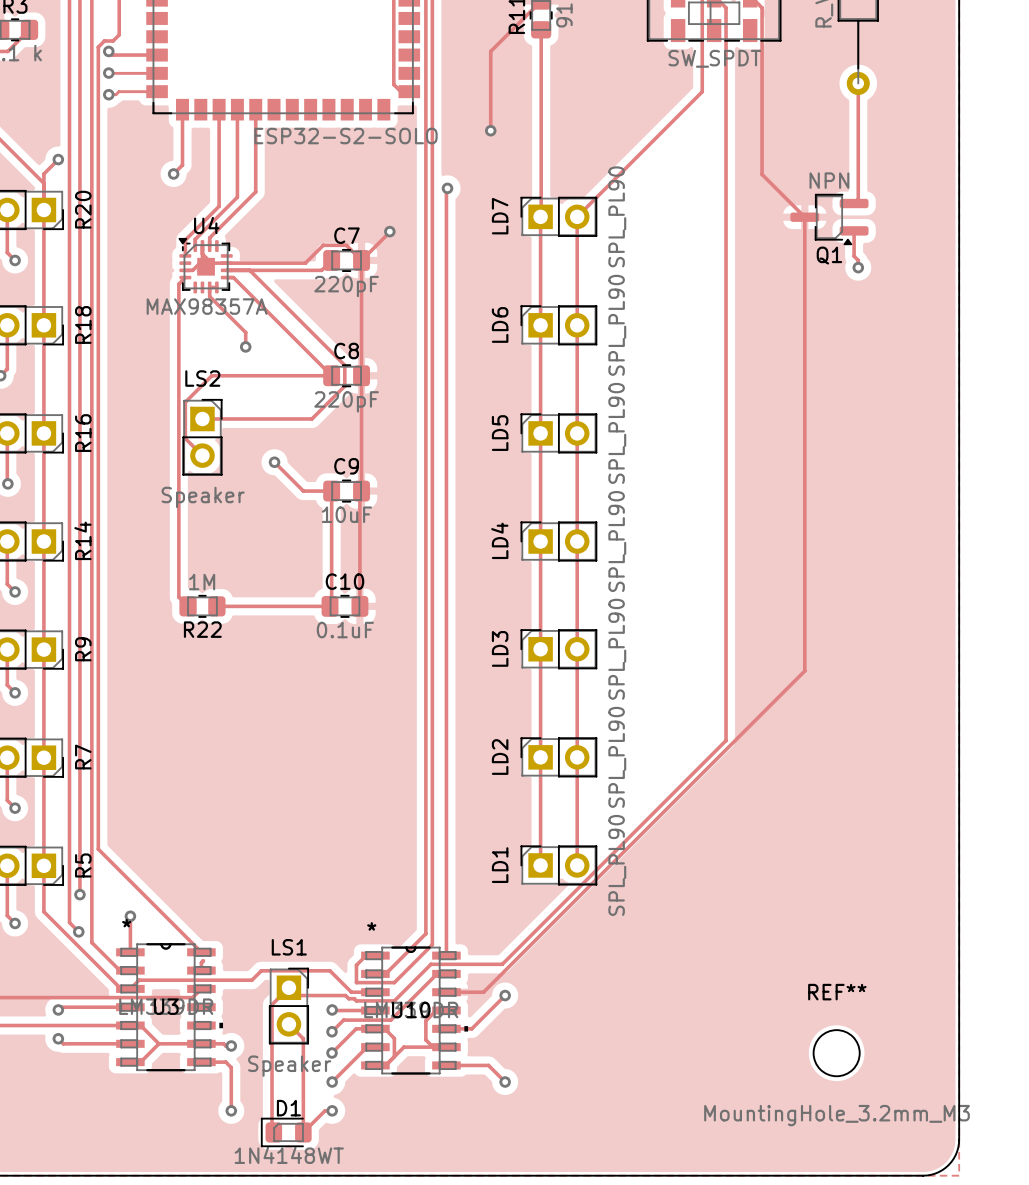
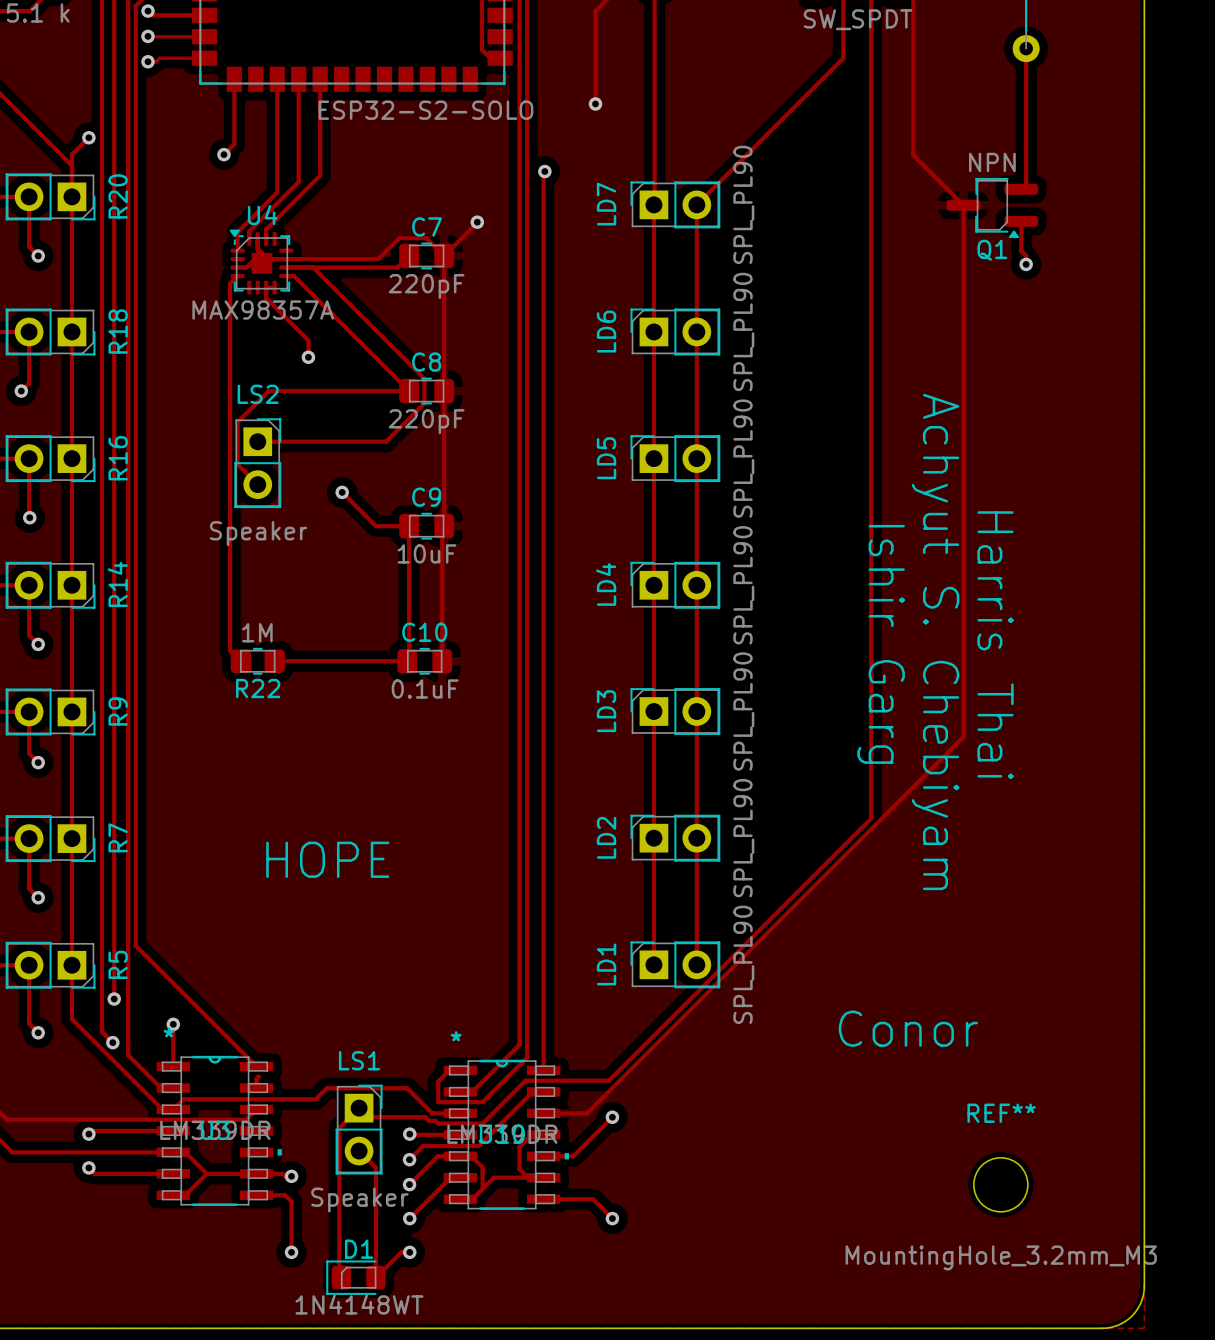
text: none -> Achyut S. Chebiyam (935, 641)
text: none -> Ishir Garg (881, 644)
text: none -> Harris Thai (995, 645)
text: none -> HOPE (327, 859)
text: none -> Conor (908, 1028)

